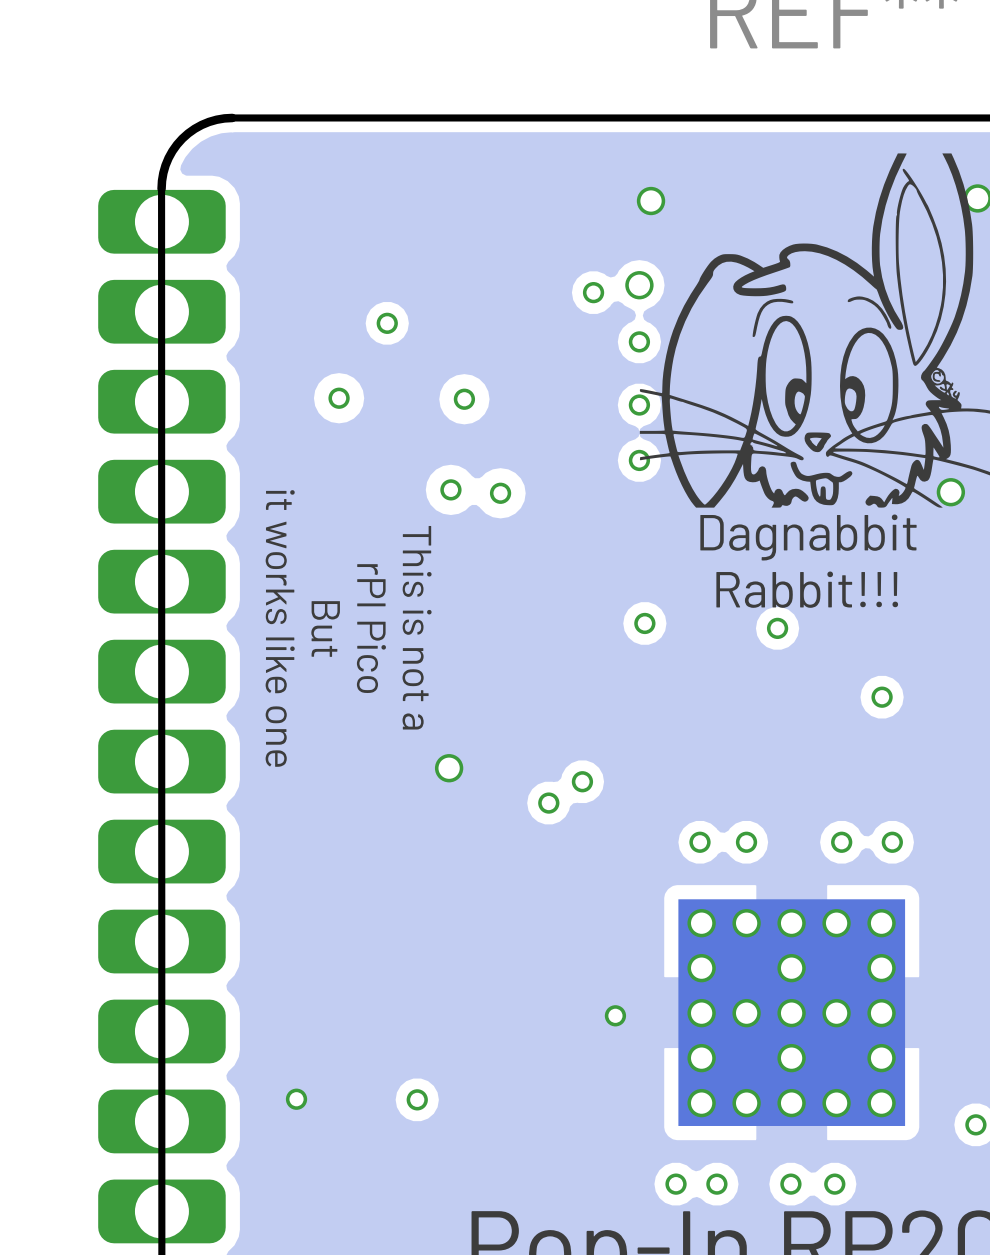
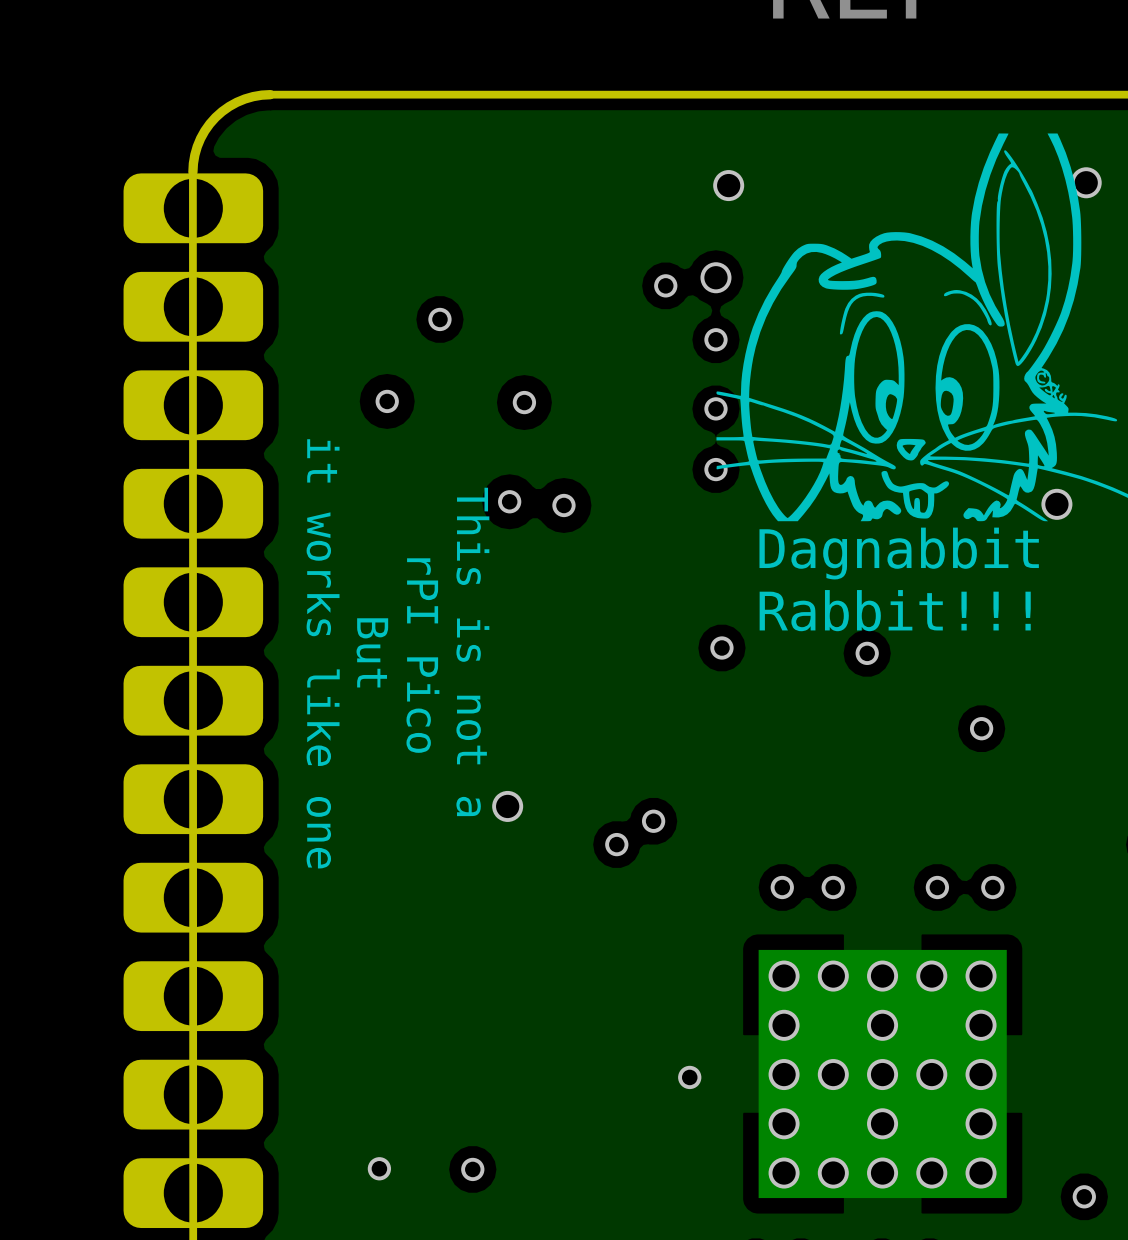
via position: (296, 1099) -> (379, 1168)

